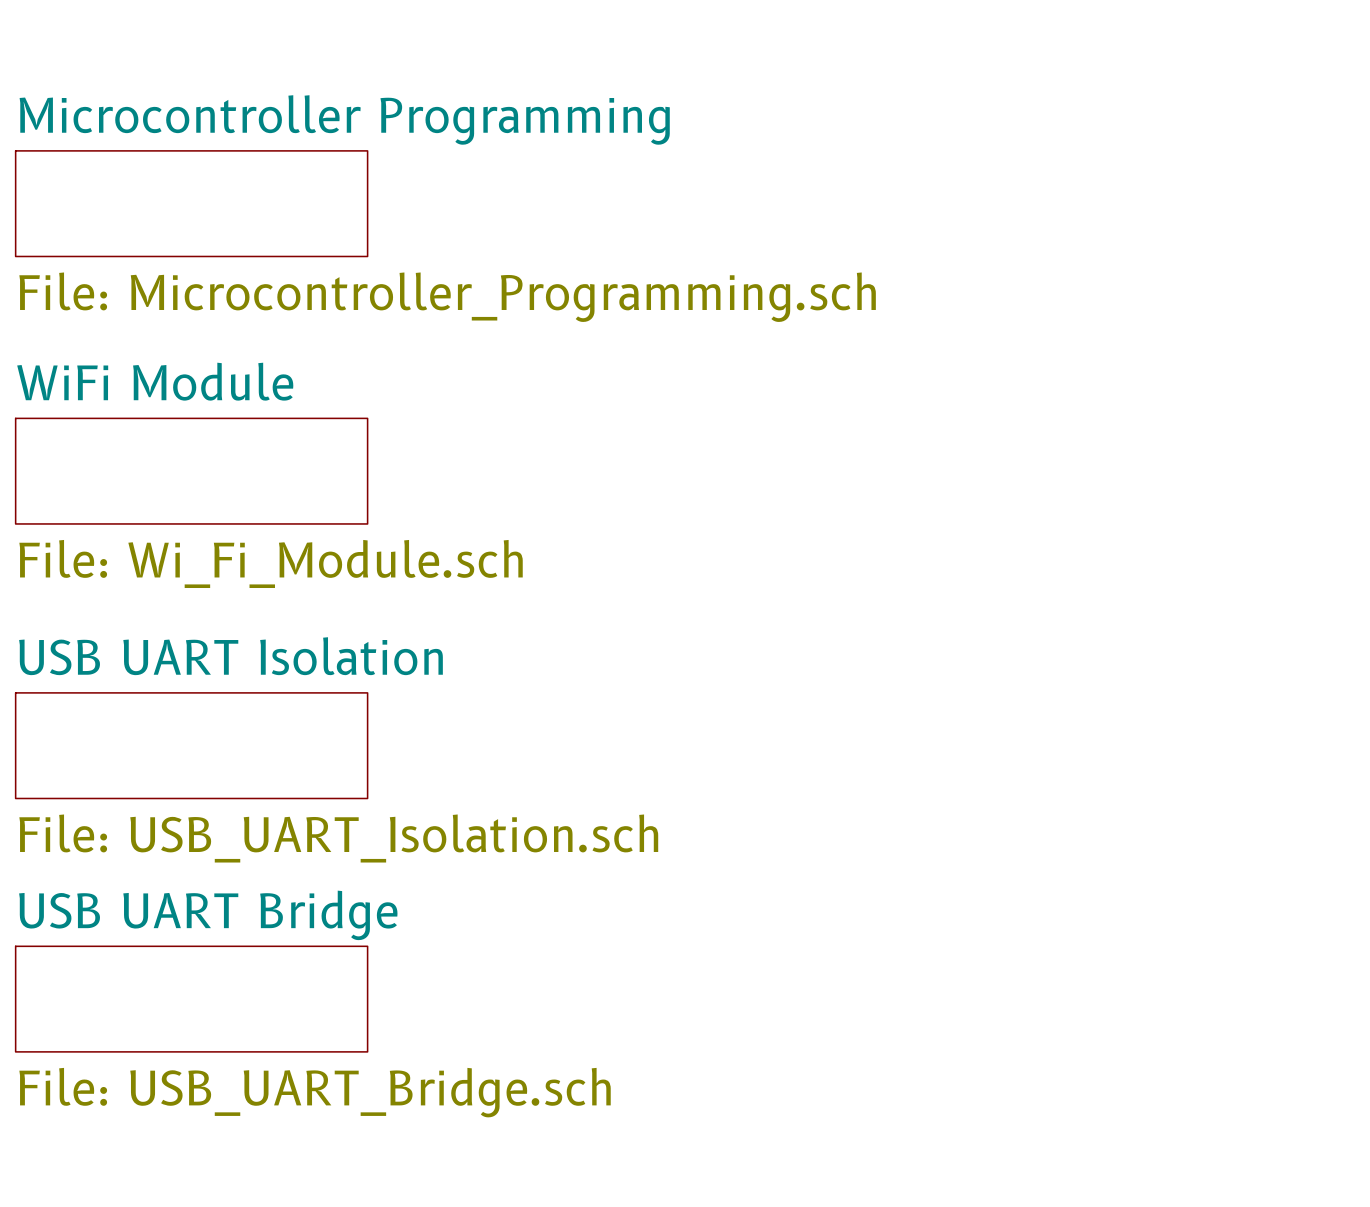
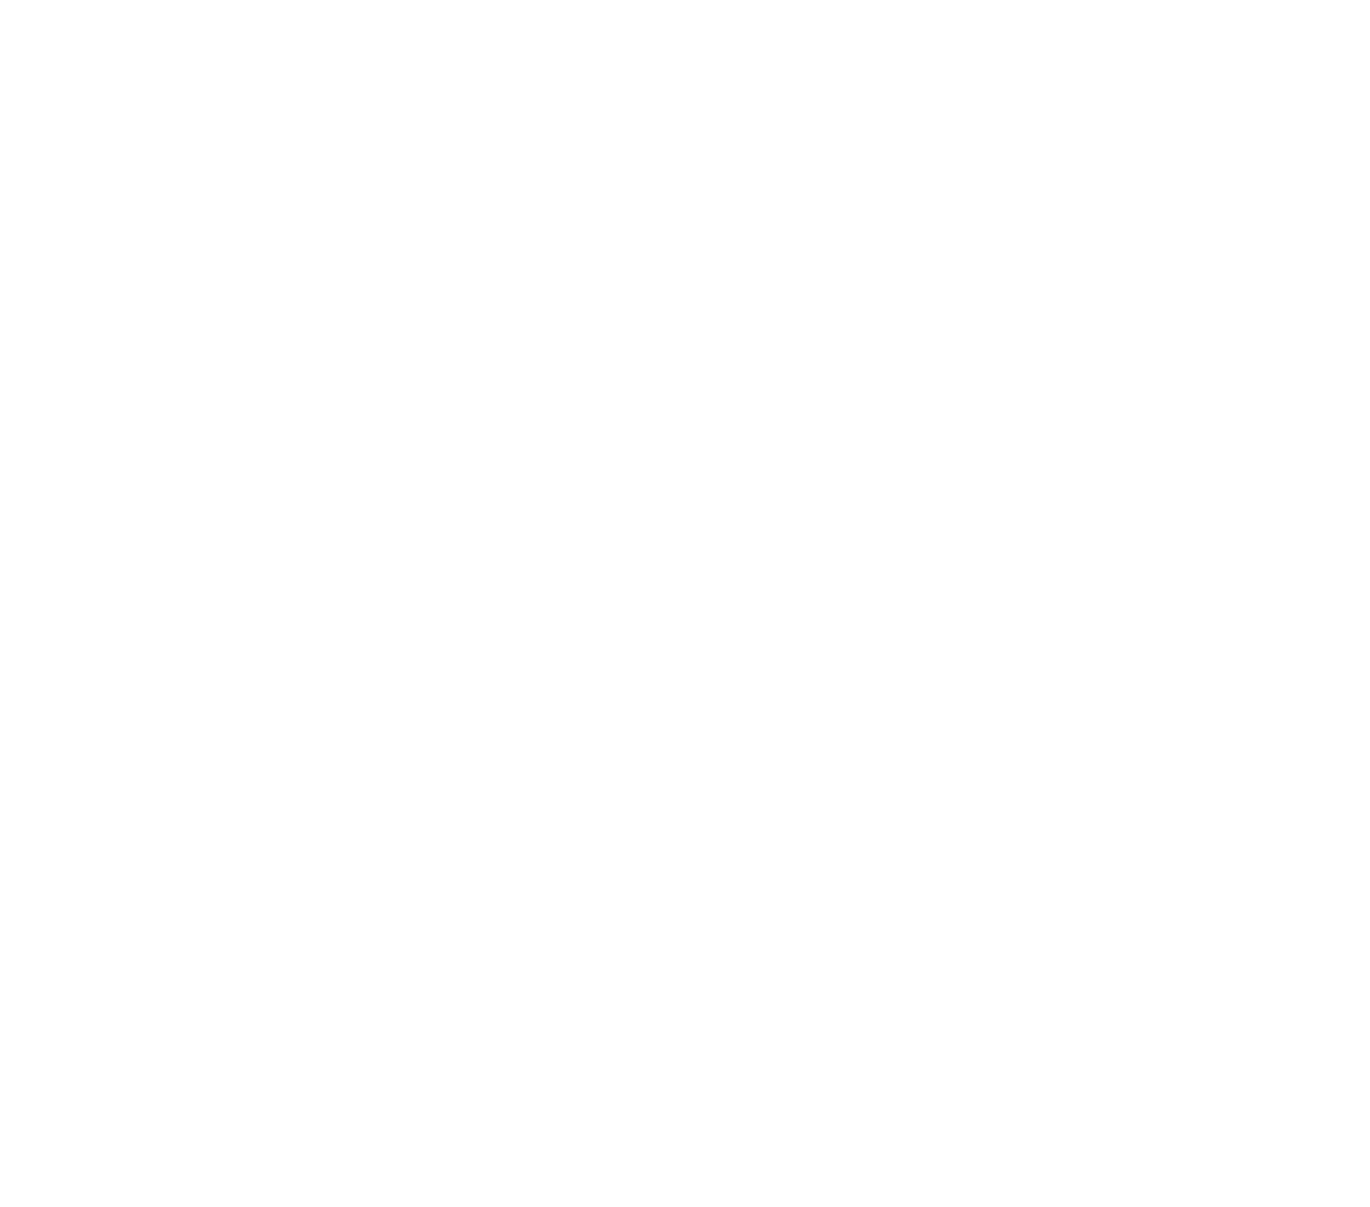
sheet Microcontroller Programming: File: Microcontroller_Programming.sch (191, 203) -> none
sheet WiFi Module: File: Wi_Fi_Module.sch (191, 471) -> none
sheet USB UART Isolation: File: USB_UART_Isolation.sch (191, 745) -> none
sheet USB UART Bridge: File: USB_UART_Bridge.sch (191, 999) -> none

